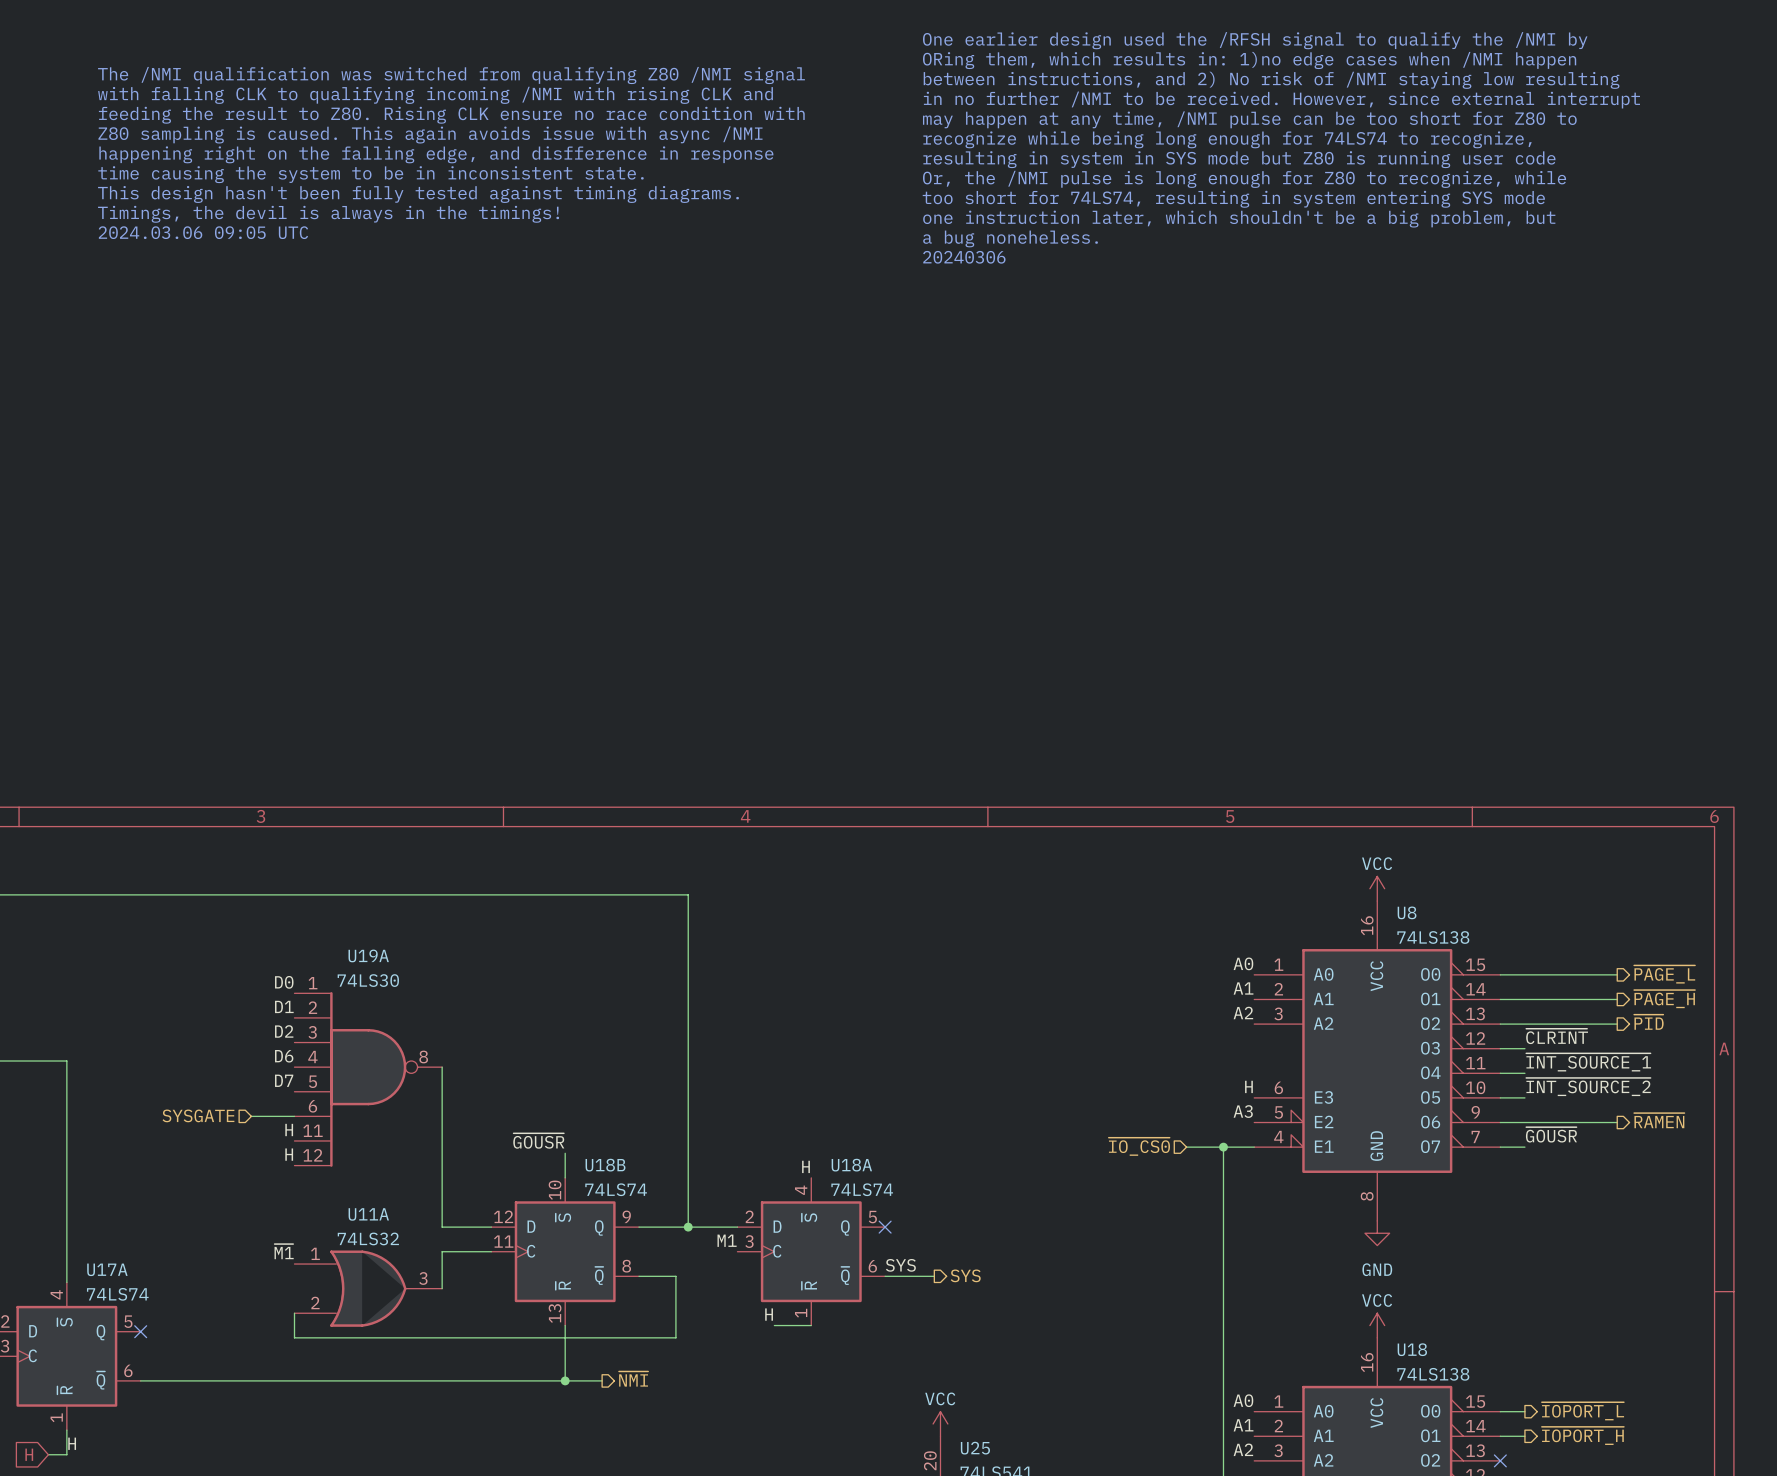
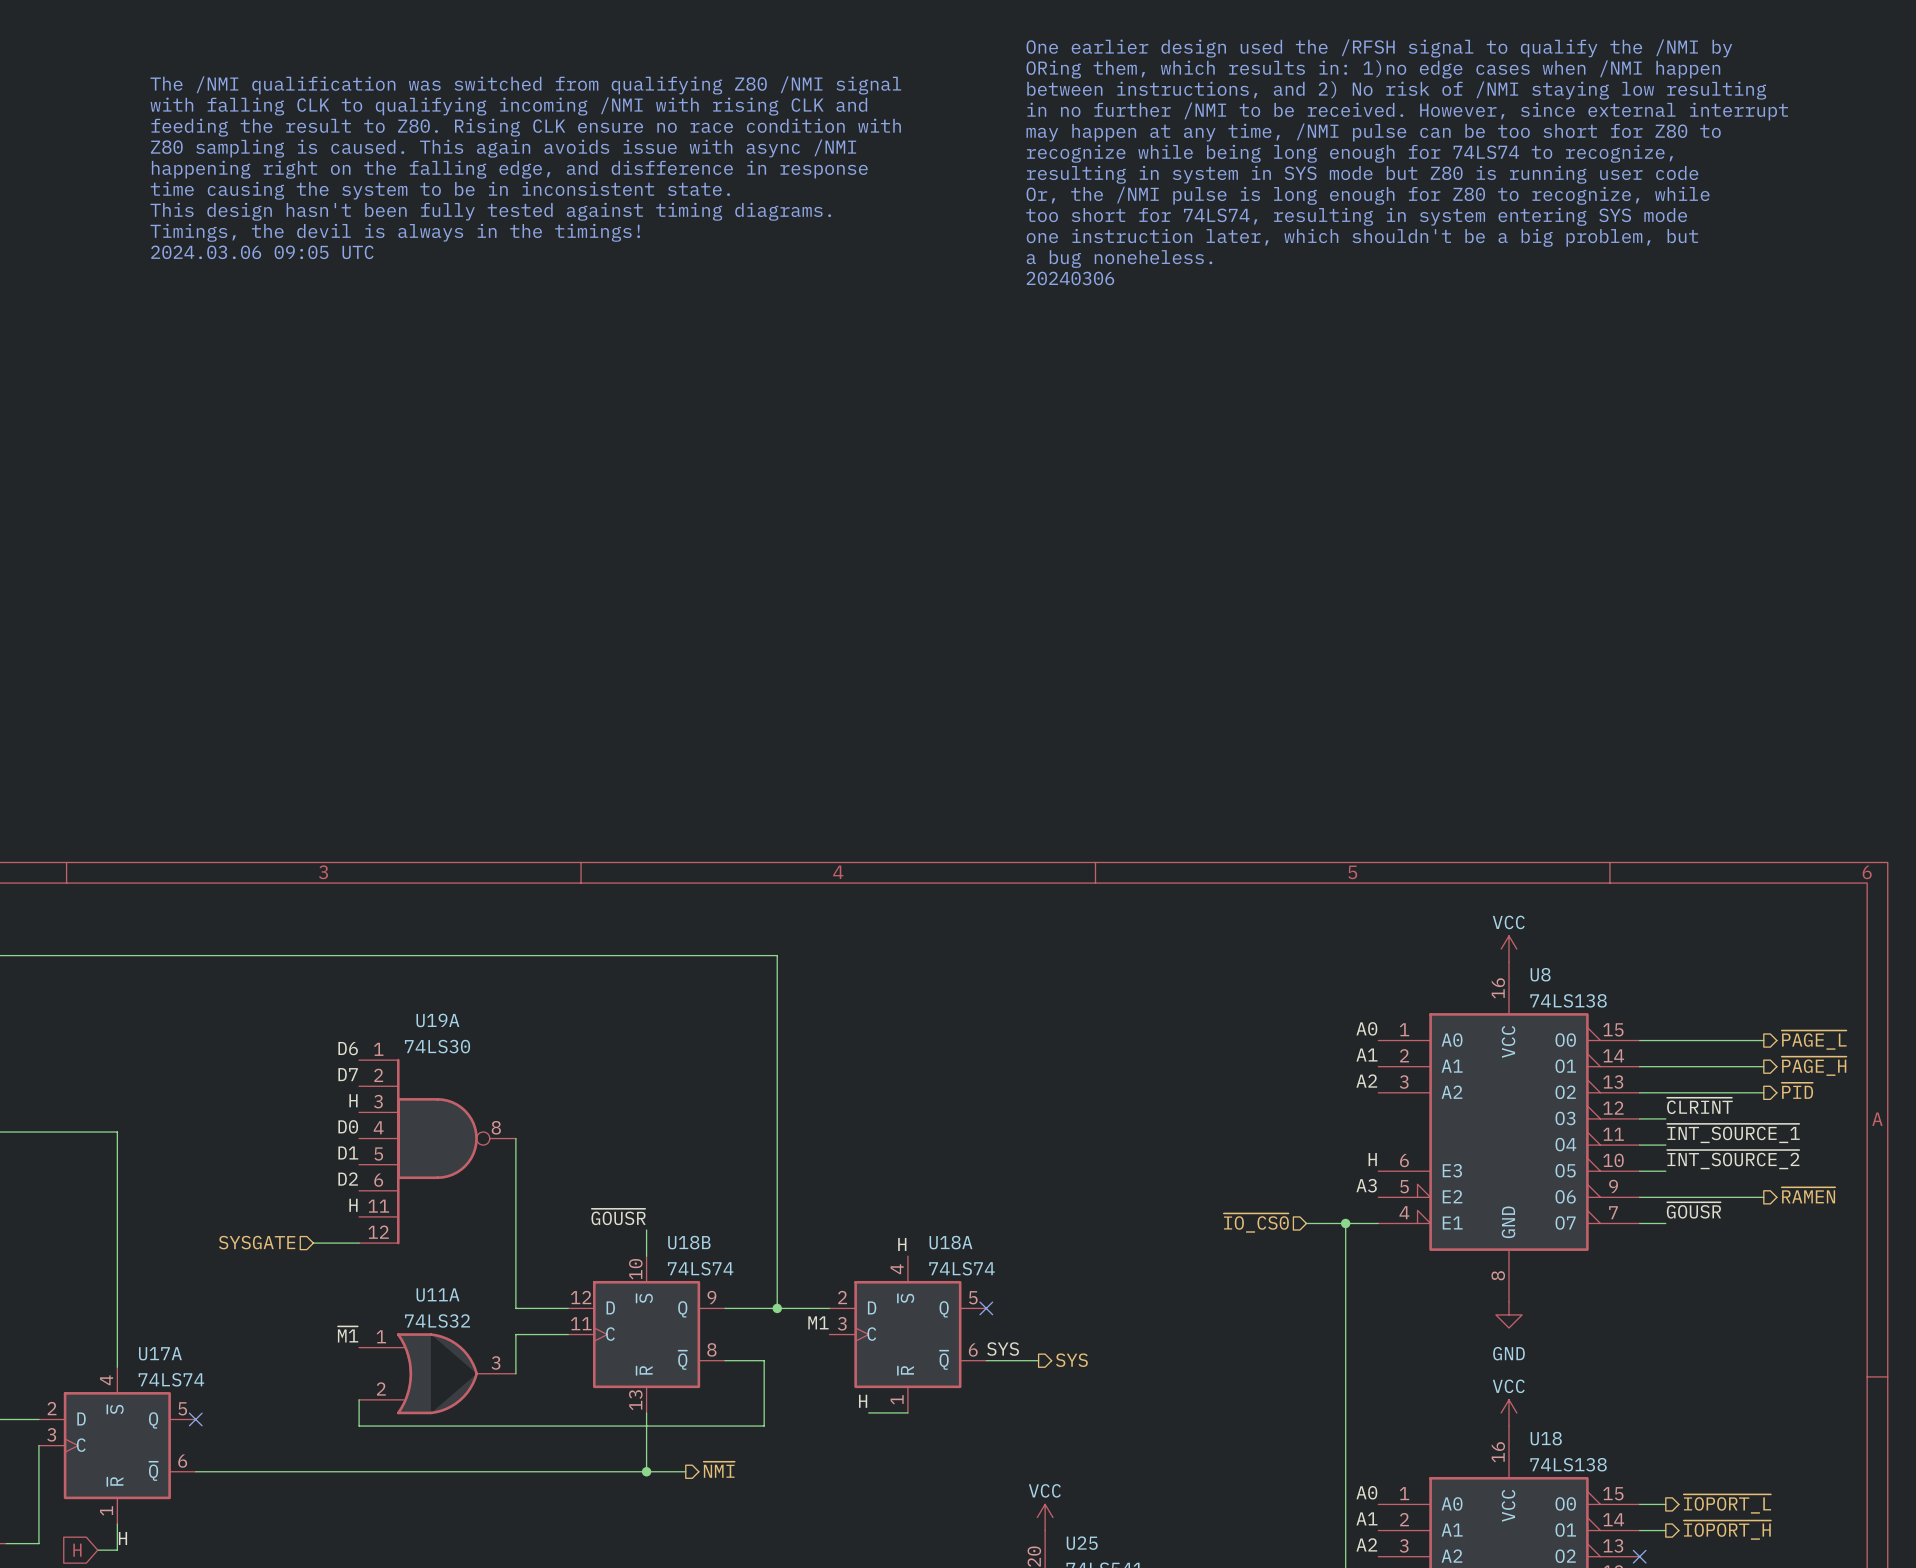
label: D0 (284, 982) -> D6 (348, 1048)
label: D1 (284, 1006) -> D7 (348, 1074)
label: D2 (284, 1031) -> H (353, 1100)
label: D6 (284, 1056) -> D0 (348, 1126)
label: D7 (284, 1080) -> D1 (348, 1153)
label: none -> D2 (348, 1179)
hierarchical label position: SYSGATE (198, 1115) -> SYSGATE (257, 1242)
wire: (251, 1116) (294, 1116) -> (313, 1243) (359, 1243)
label: H (289, 1154) -> none

